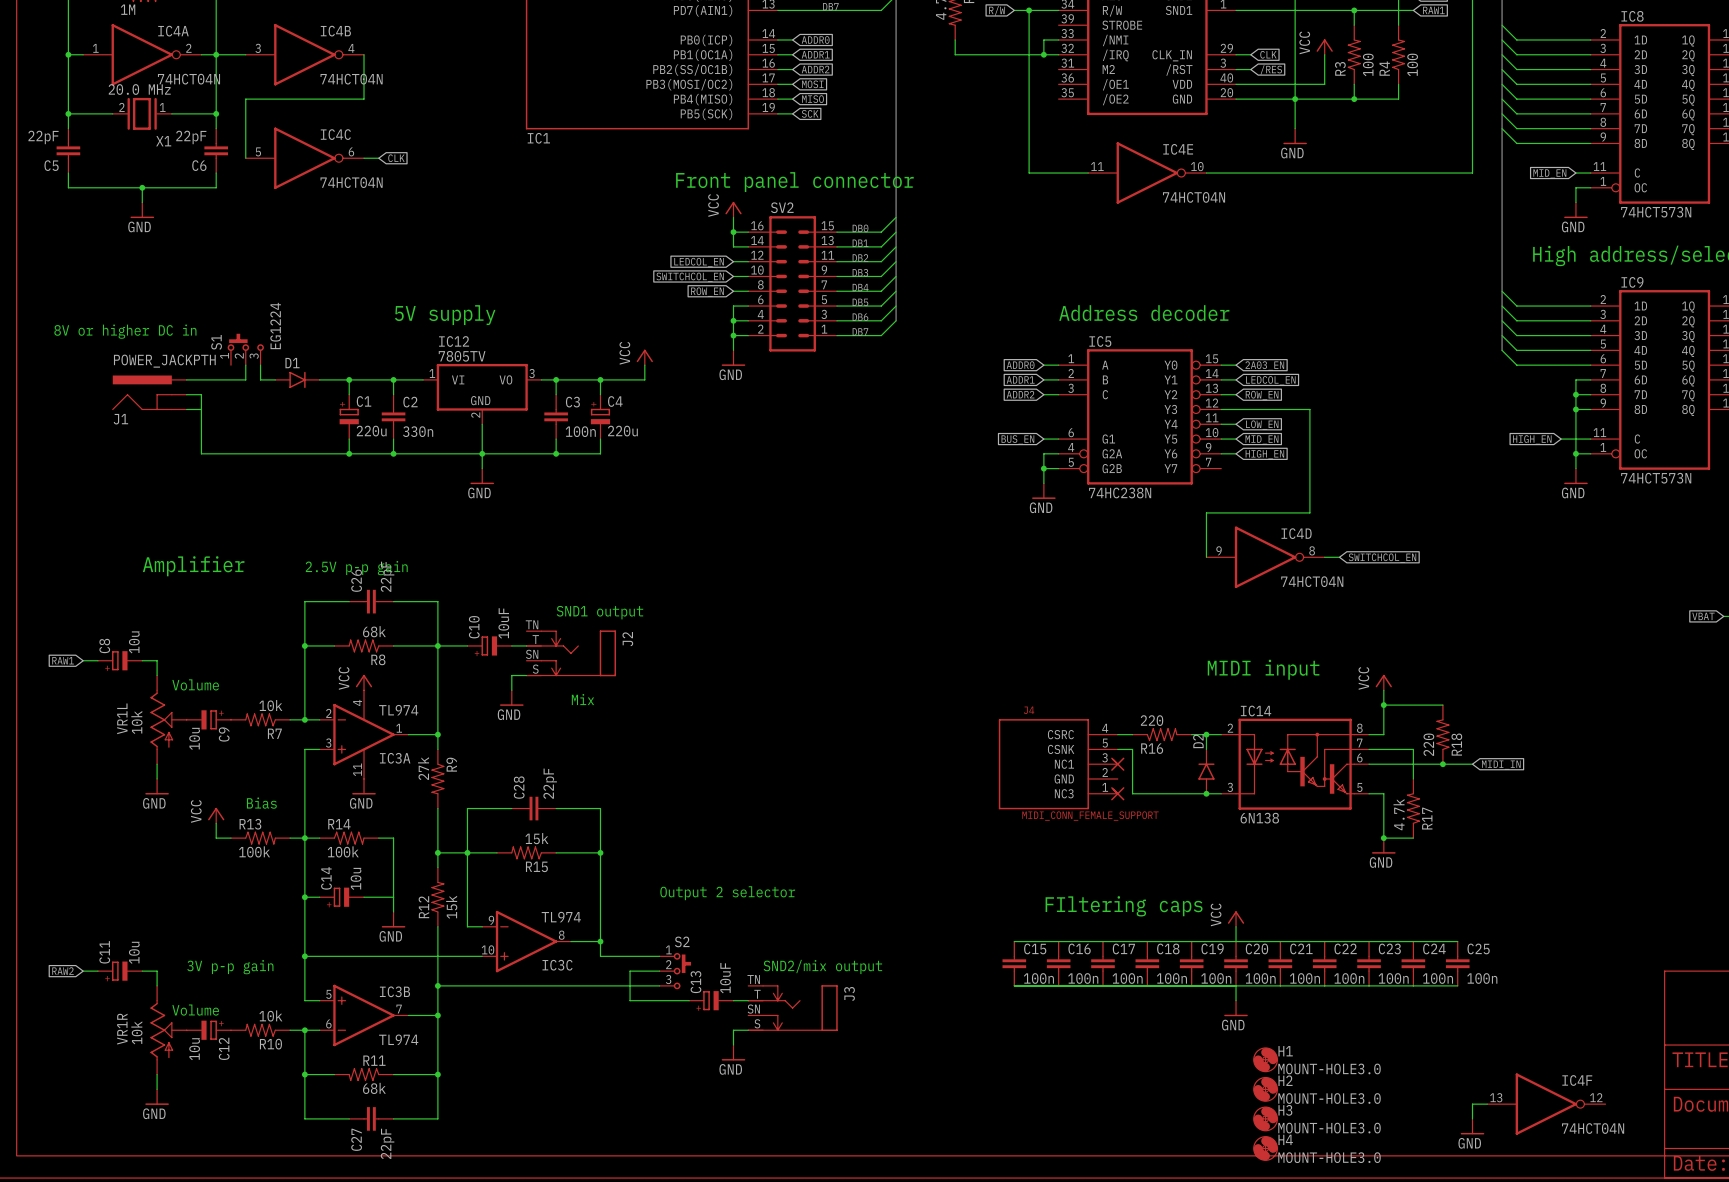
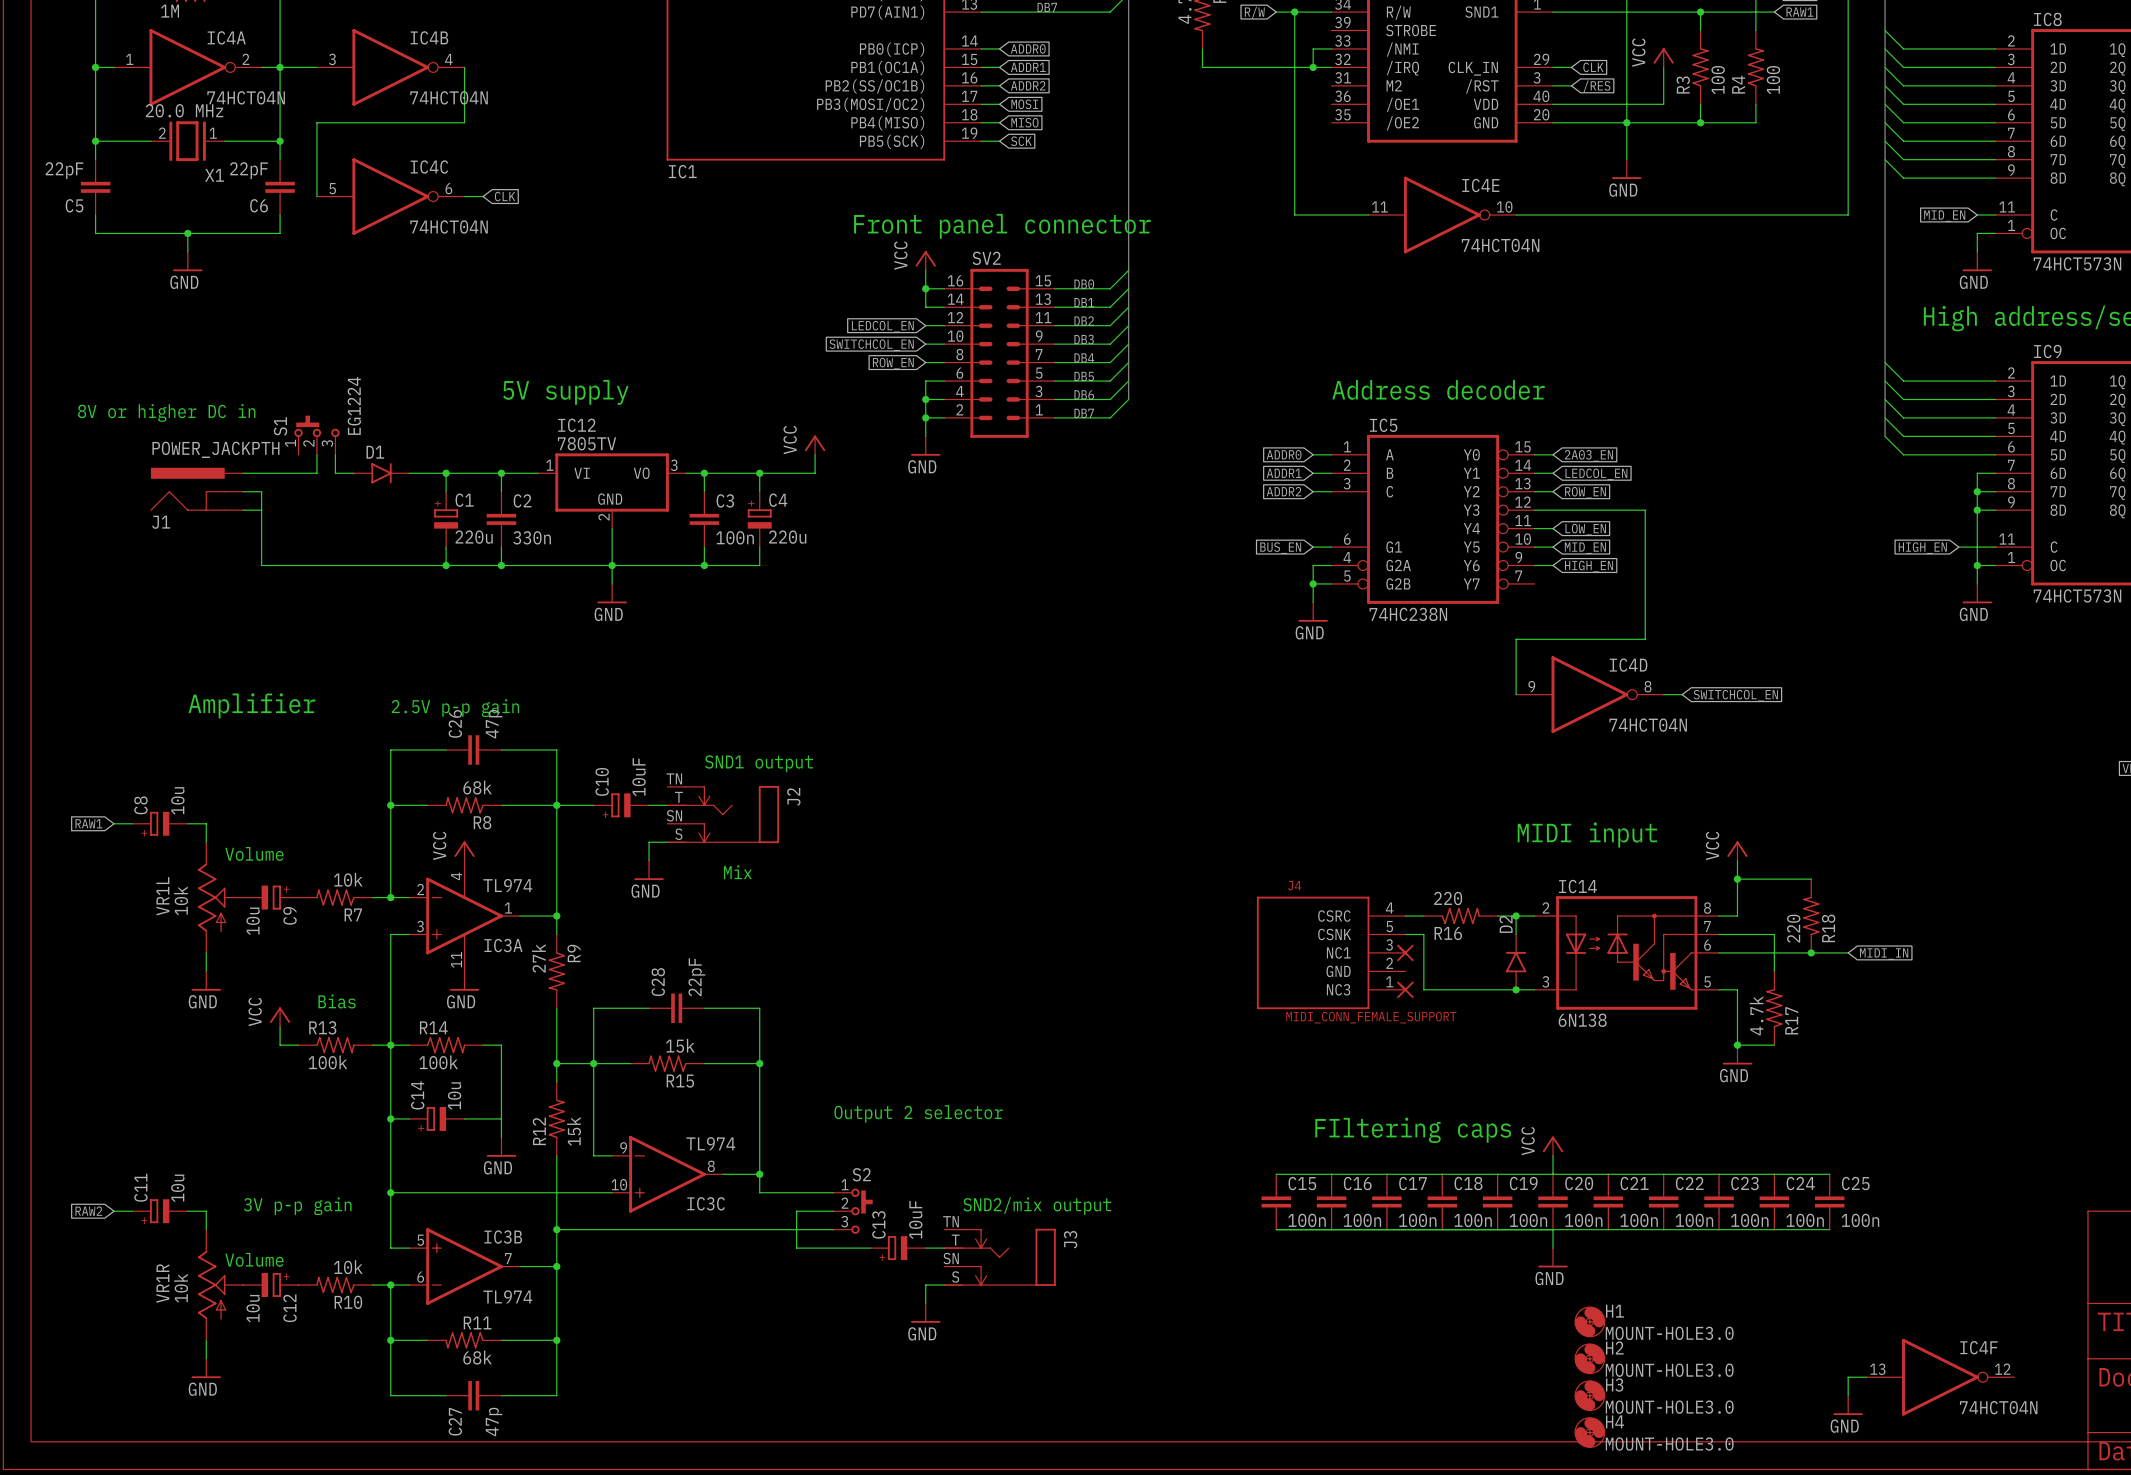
C26 value: 22pF (387, 576) -> 47p (494, 724)
C27 value: 22pF (387, 1143) -> 47p (494, 1421)

